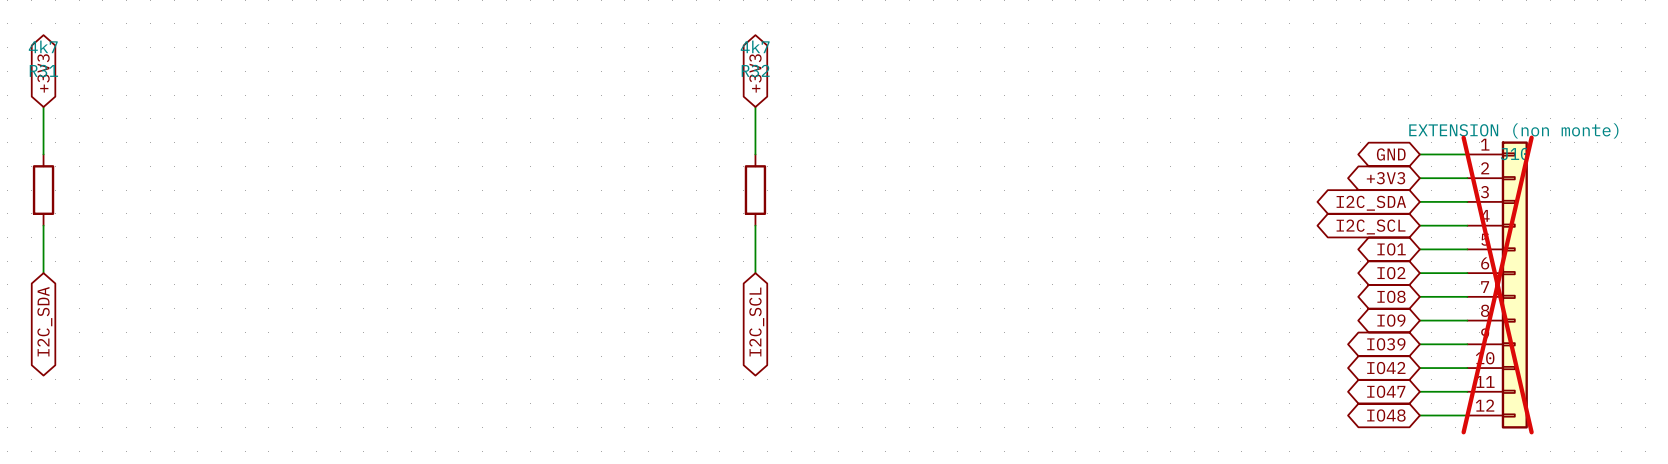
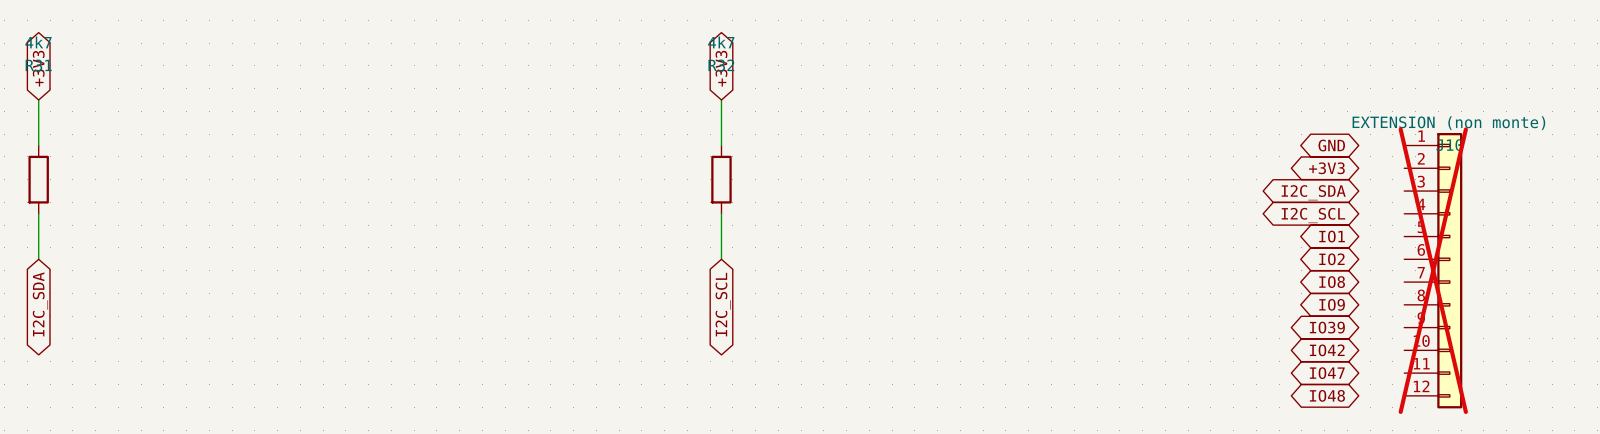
wire: (1419, 154) (1467, 154) -> none
wire: (1419, 178) (1467, 178) -> none
wire: (1419, 201) (1467, 201) -> none
wire: (1419, 225) (1467, 225) -> none
wire: (1419, 249) (1467, 249) -> none
wire: (1419, 273) (1467, 273) -> none
wire: (1419, 296) (1467, 296) -> none
wire: (1419, 320) (1467, 320) -> none
wire: (1419, 344) (1467, 344) -> none
wire: (1419, 368) (1467, 368) -> none
wire: (1419, 391) (1467, 391) -> none
wire: (1419, 415) (1467, 415) -> none

